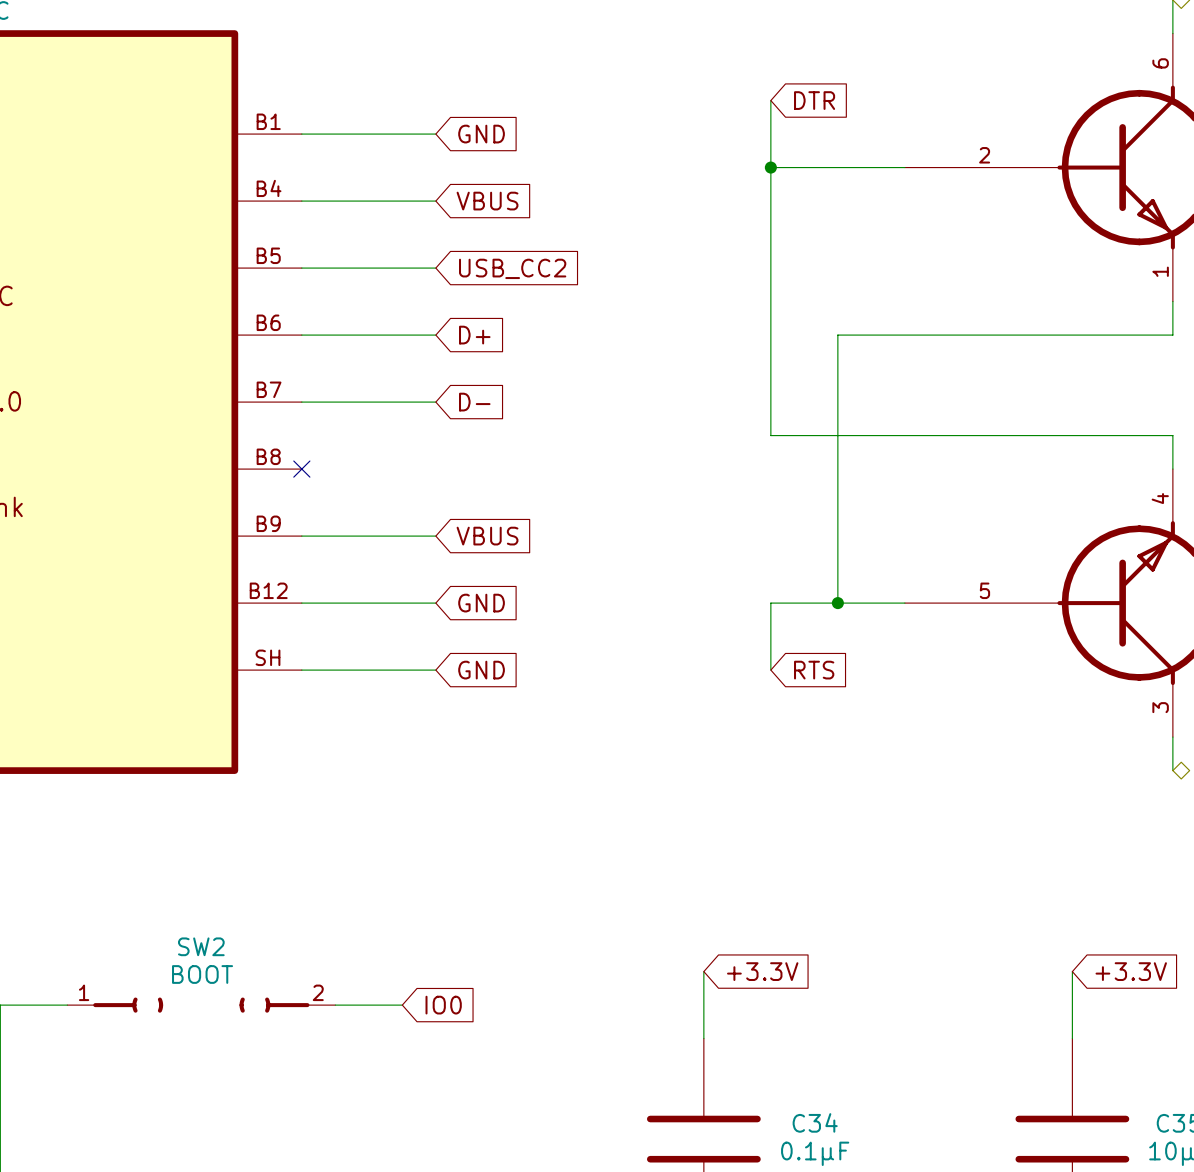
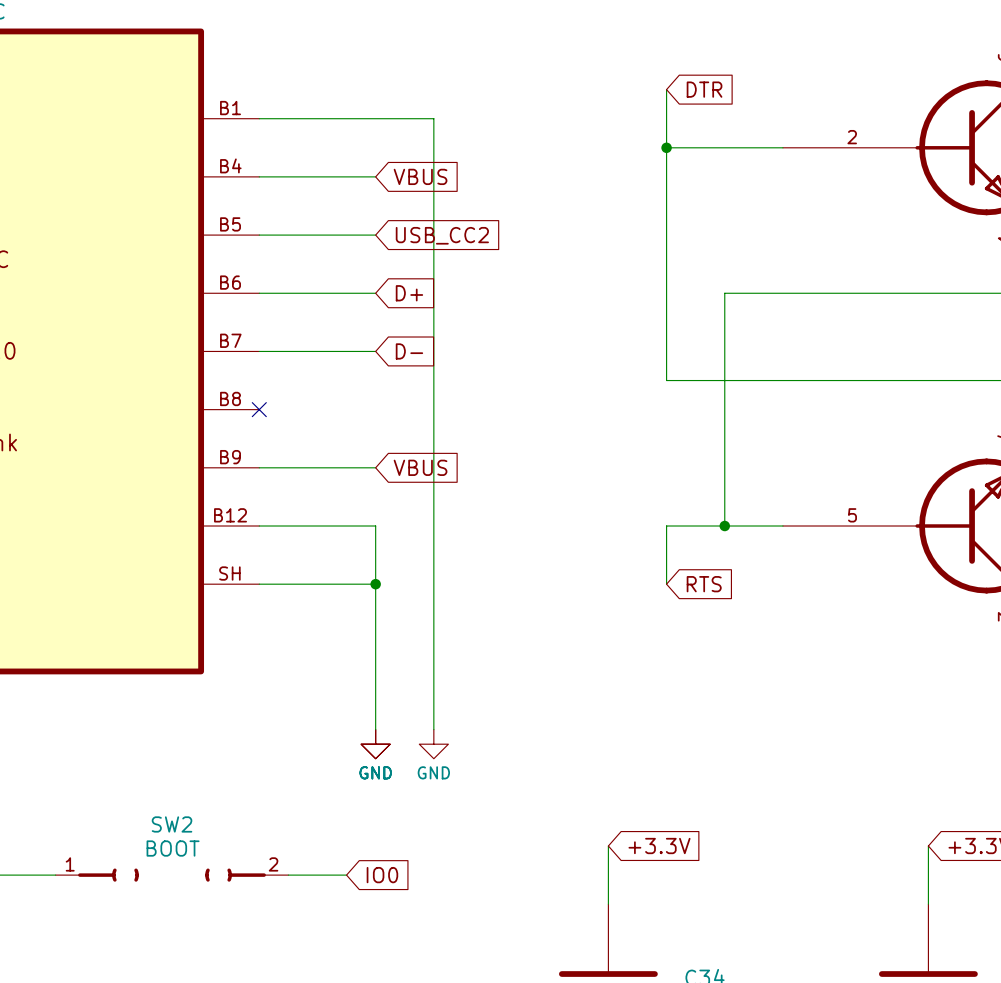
wire: none -> (375, 118) (433, 118) (433, 729)
global label: GND (481, 134) -> none
wire: none -> (375, 526) (375, 729)
global label: GND (481, 603) -> none
junction: none -> (375, 584)
global label: GND (481, 670) -> none
power symbol: none -> GND (375, 744)
power symbol: none -> GND (433, 744)

